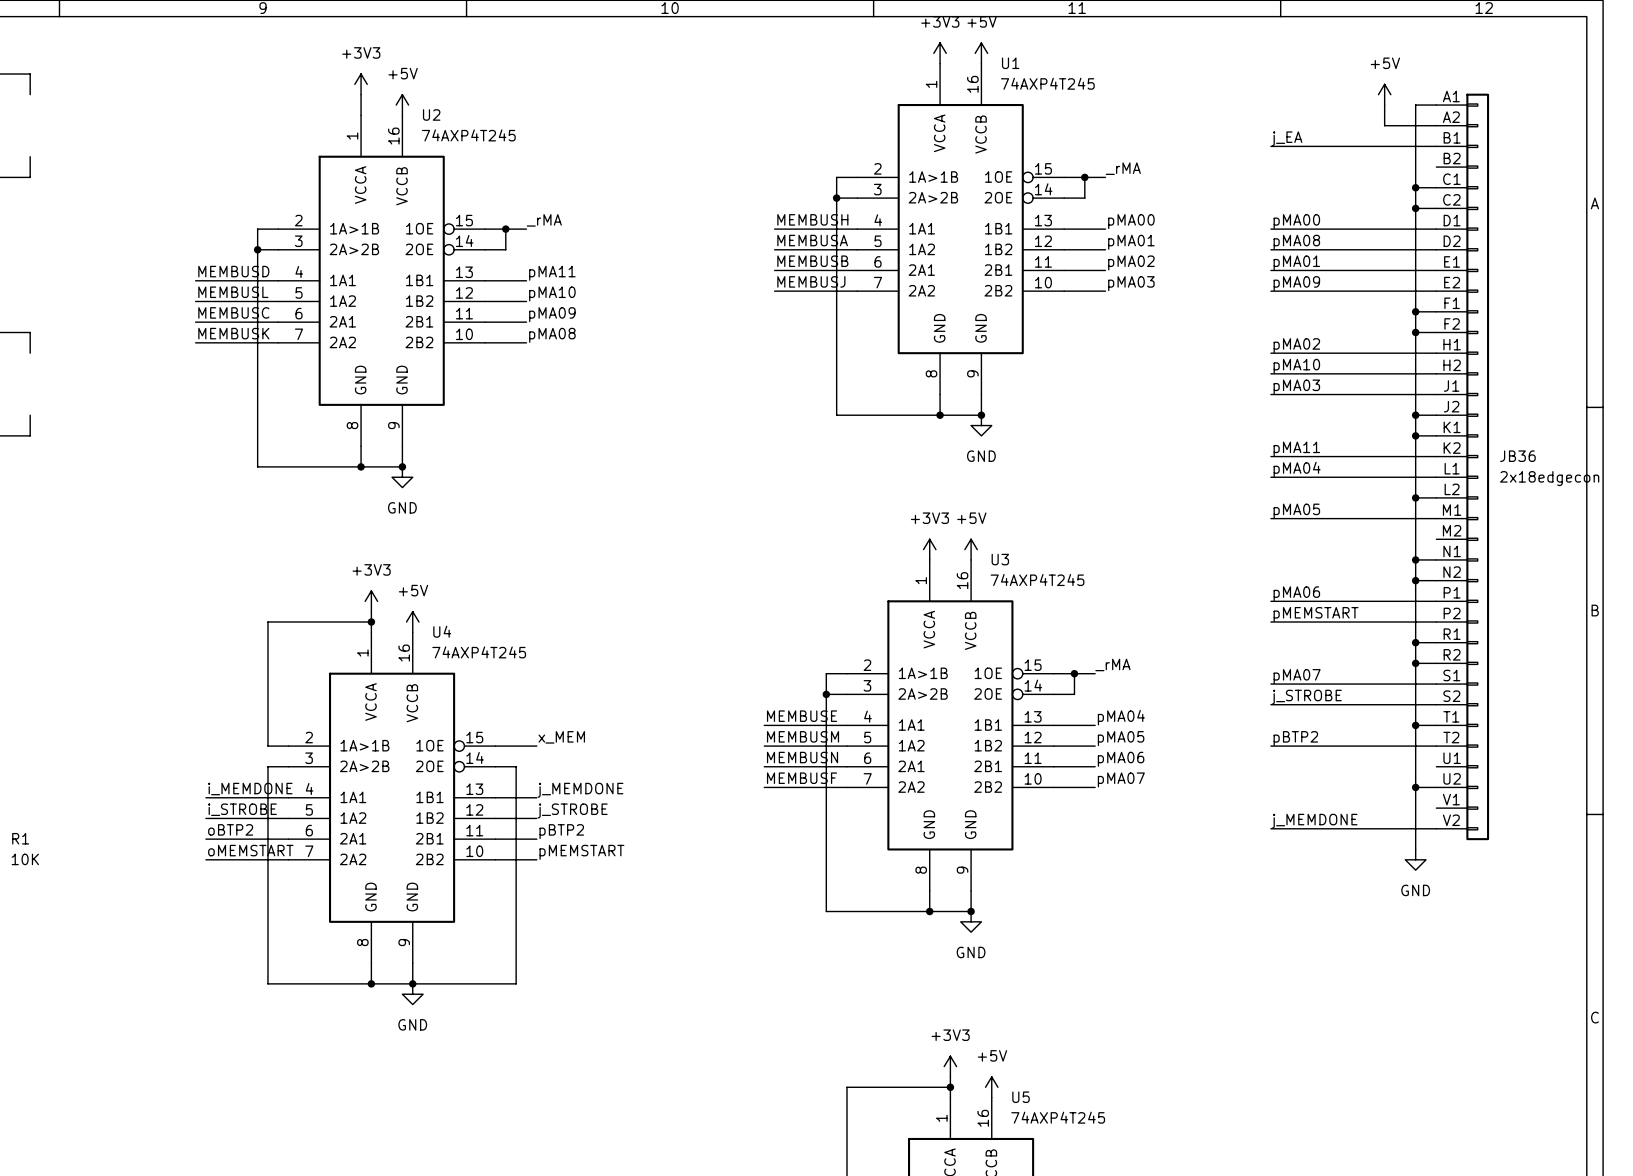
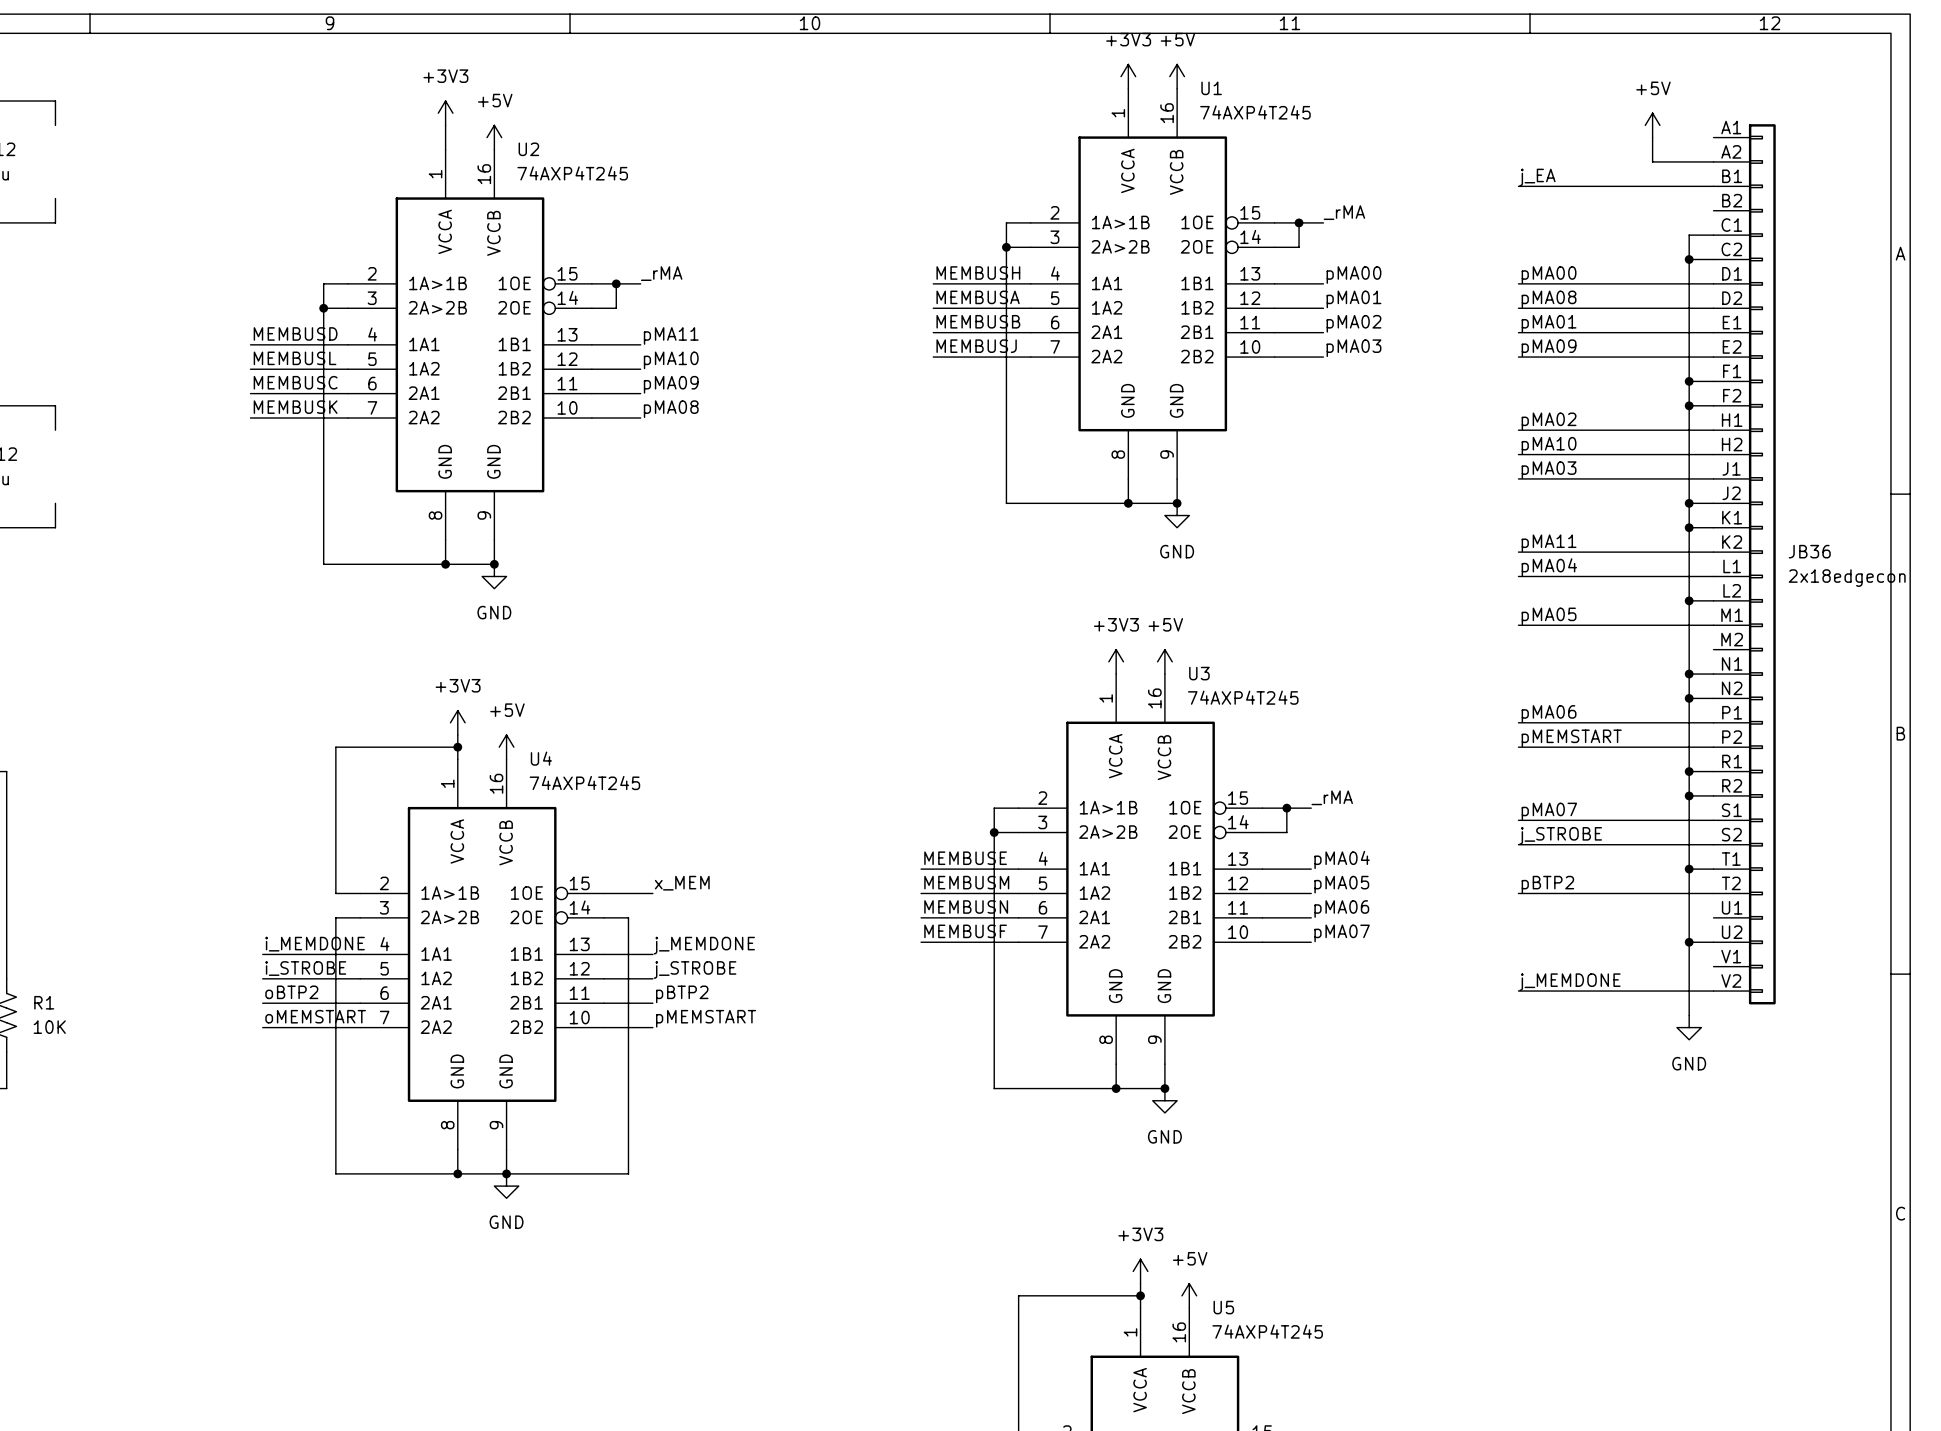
wire: (1436, 105) (1415, 105) (1415, 187) -> none
junction: (1415, 187) -> none

